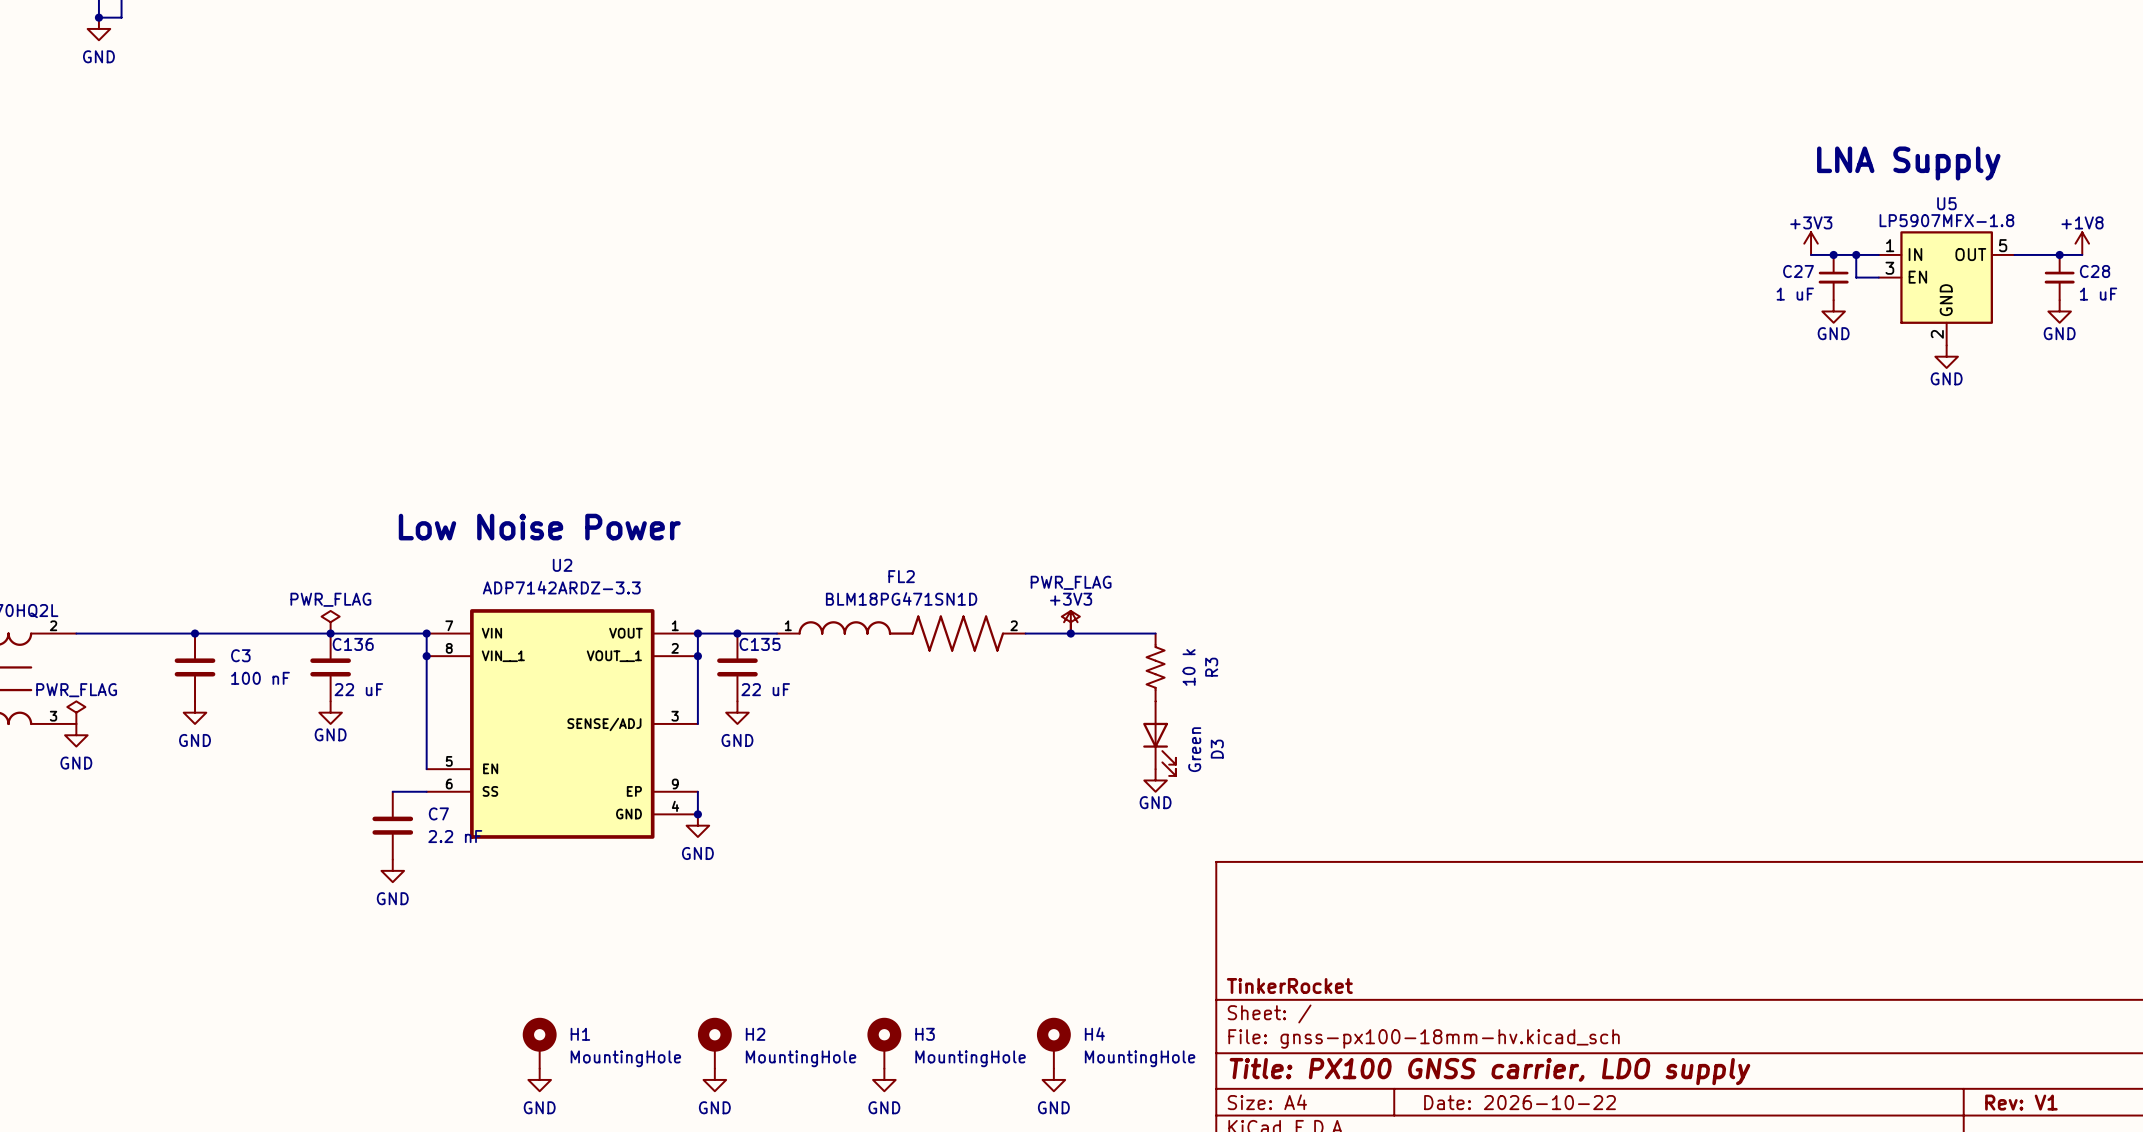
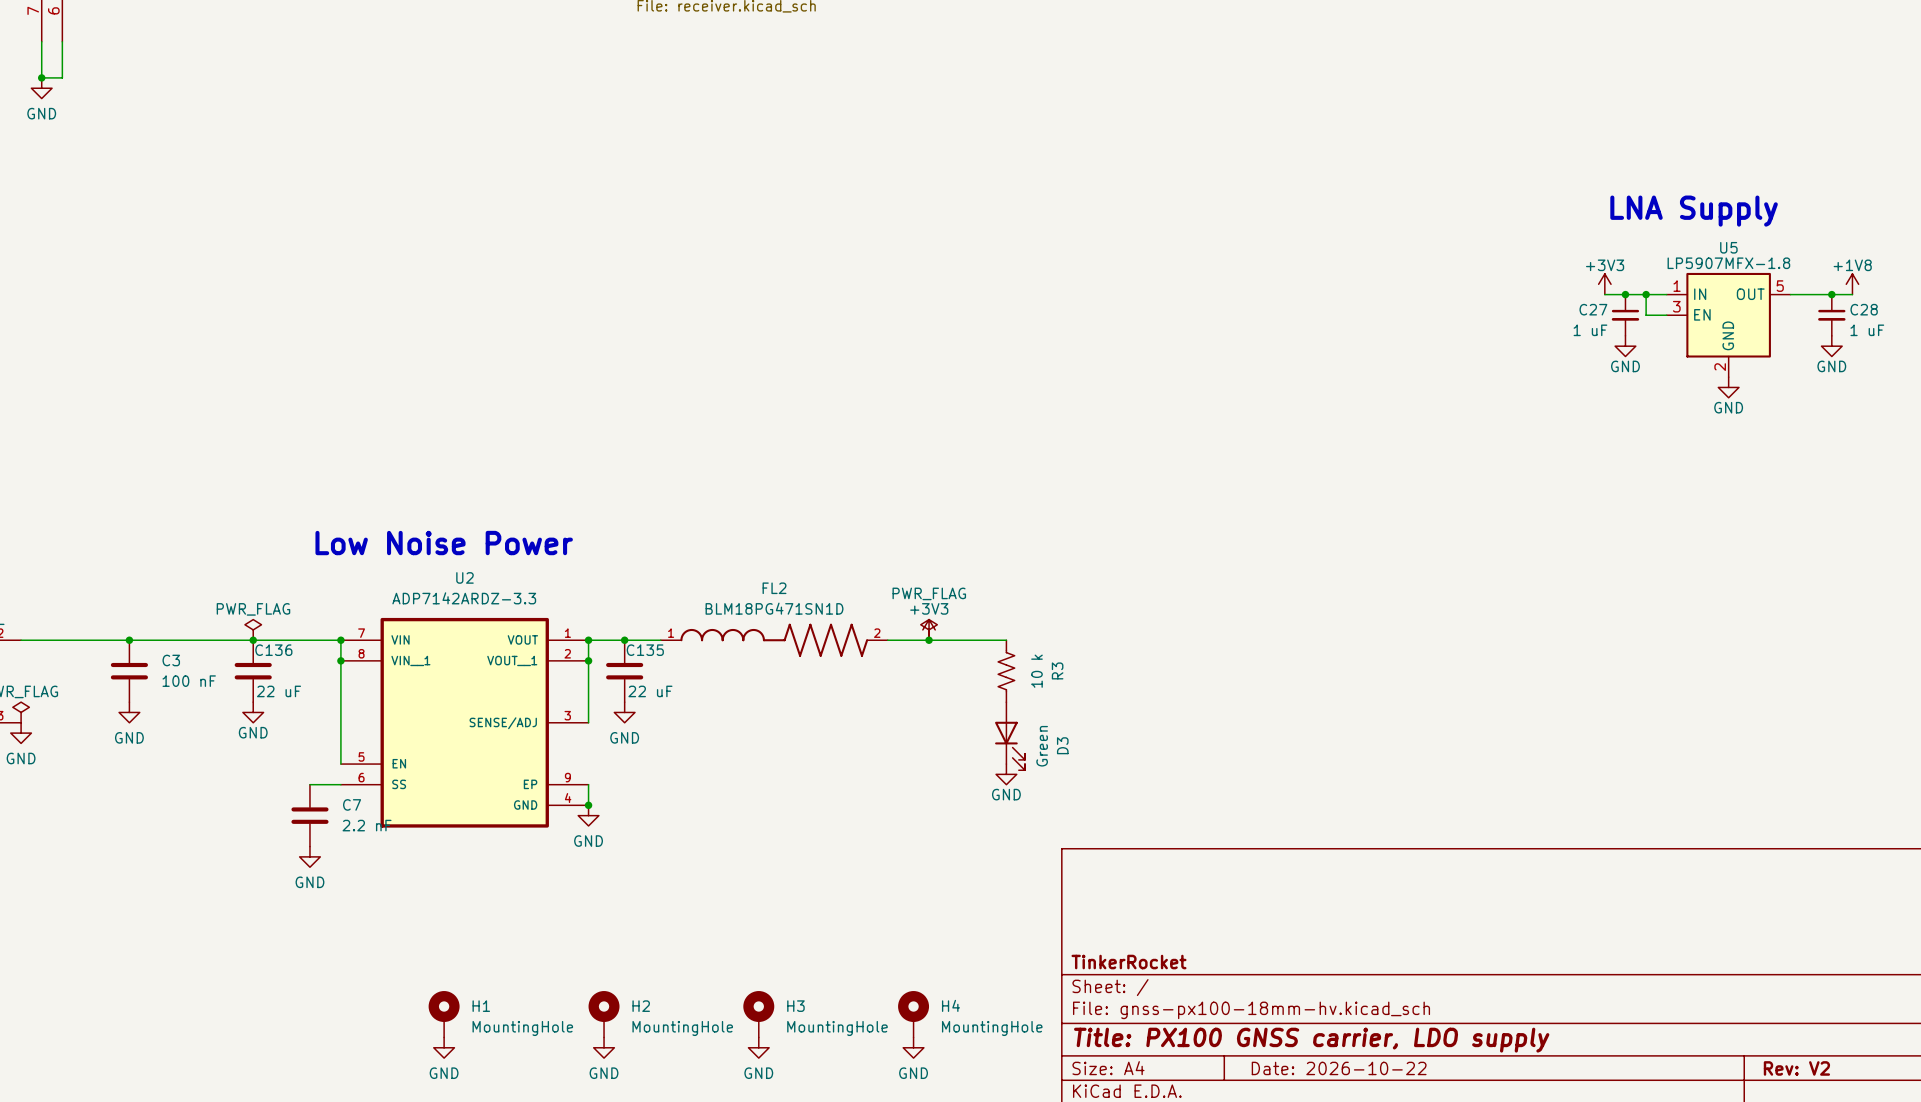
title block: Rev: V1 (2021, 1102) -> Rev: V2 (1796, 1068)

